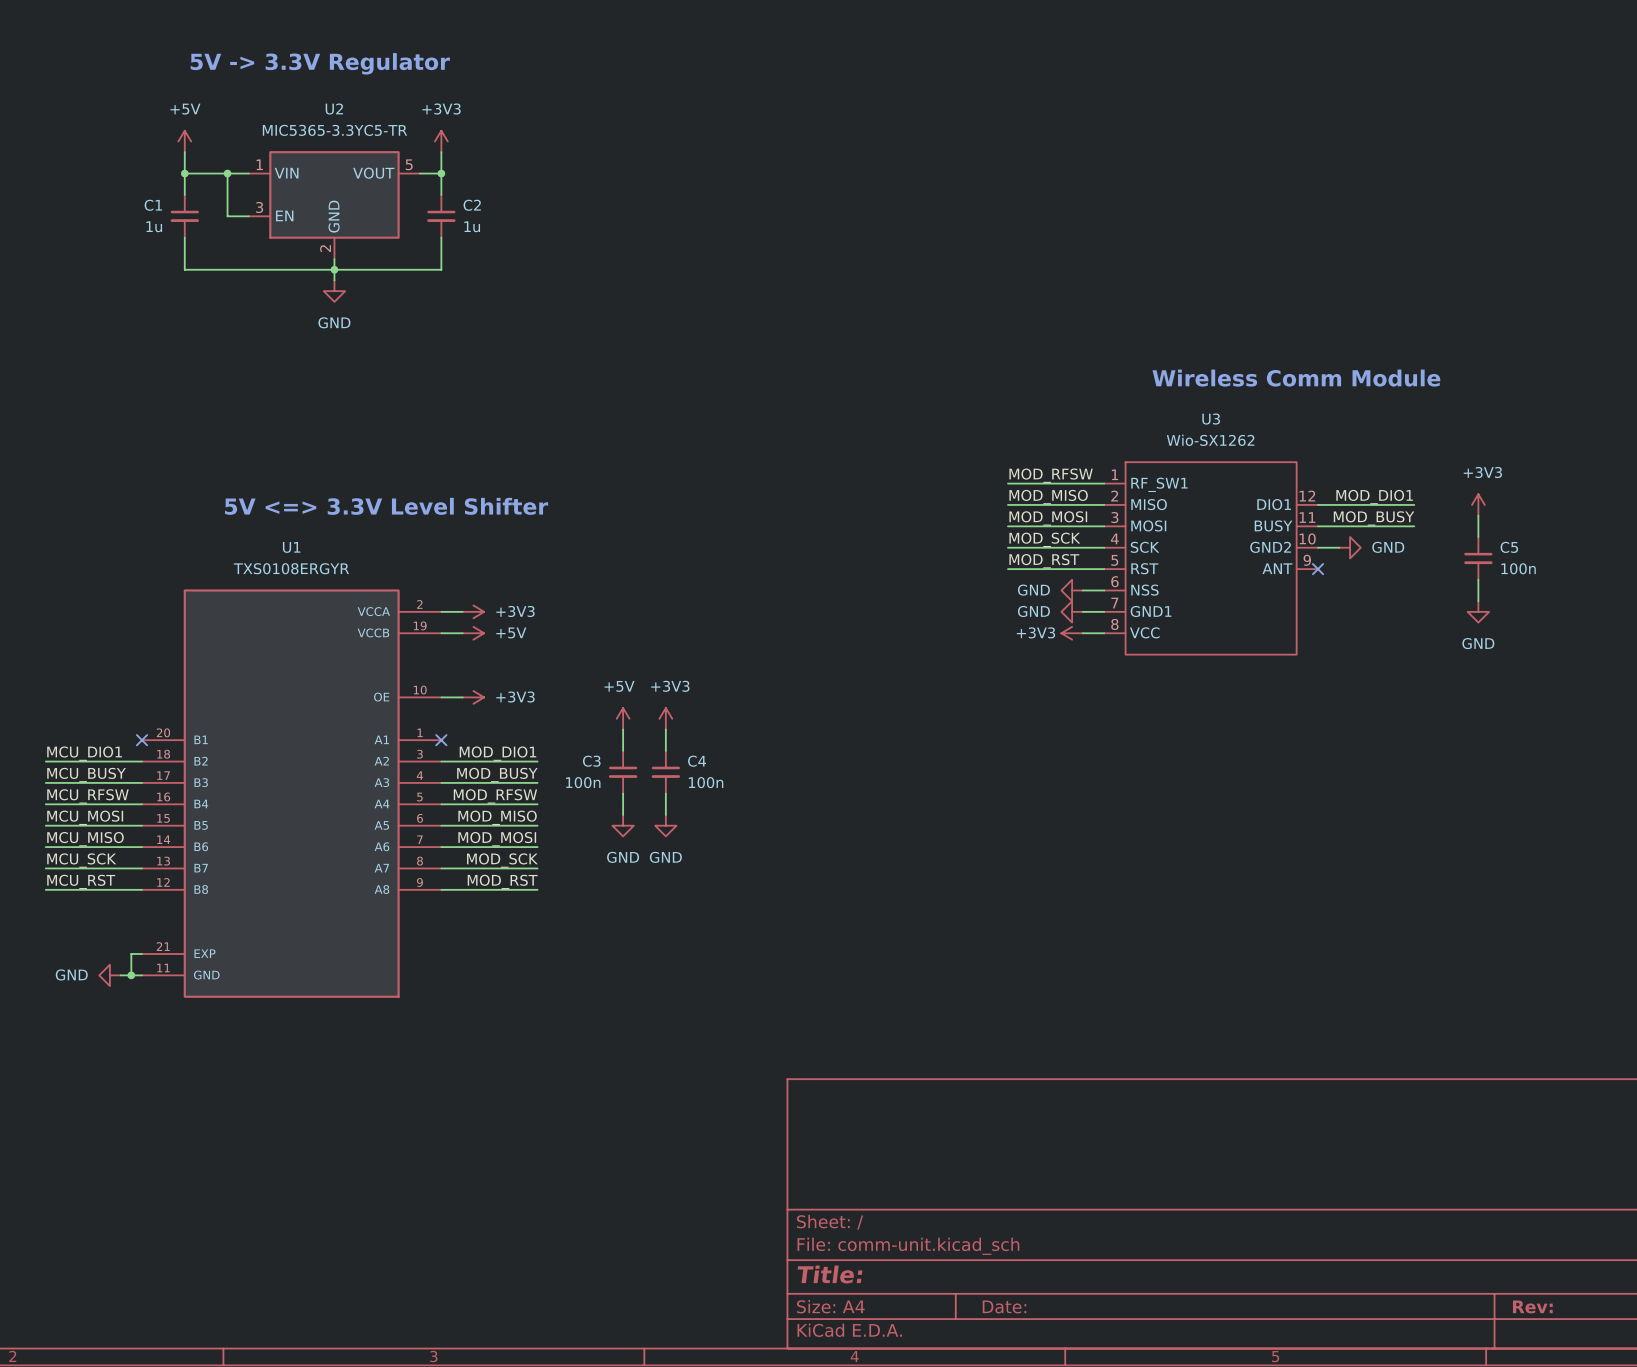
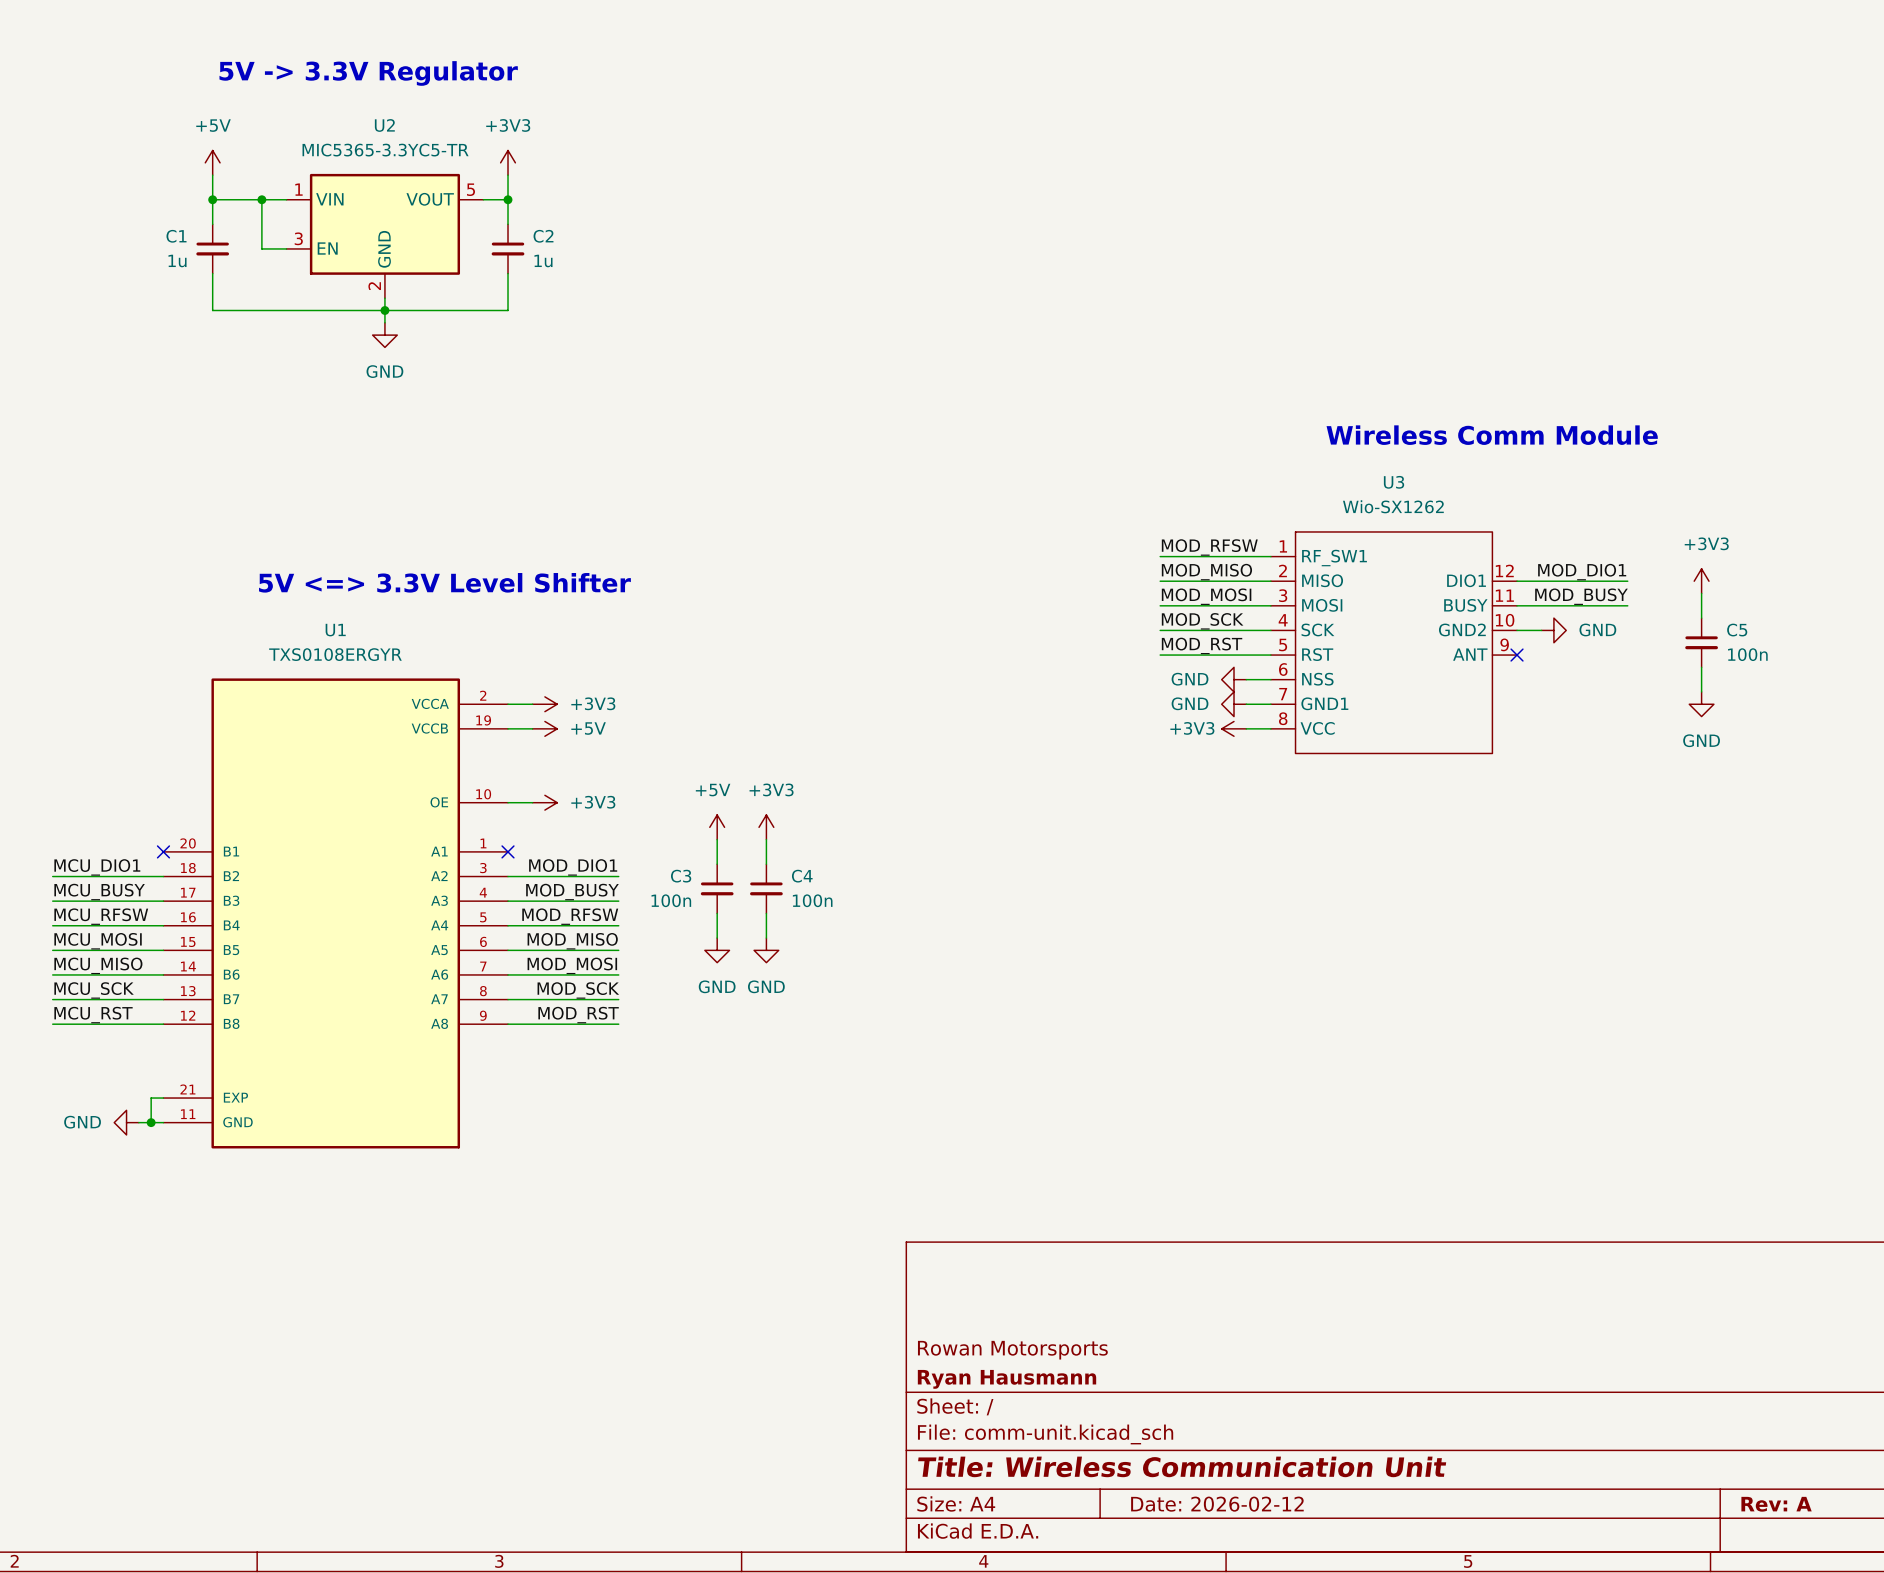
title block: none -> Rowan Motorsports (1012, 1350)
title block: none -> Ryan Hausmann (1007, 1379)
title block: Title: (830, 1274) -> Title: Wireless Communication Unit (1182, 1466)
title block: Date: (1004, 1306) -> Date: 2026-02-12 (1217, 1504)
title block: Rev: (1532, 1306) -> Rev: A (1776, 1504)

